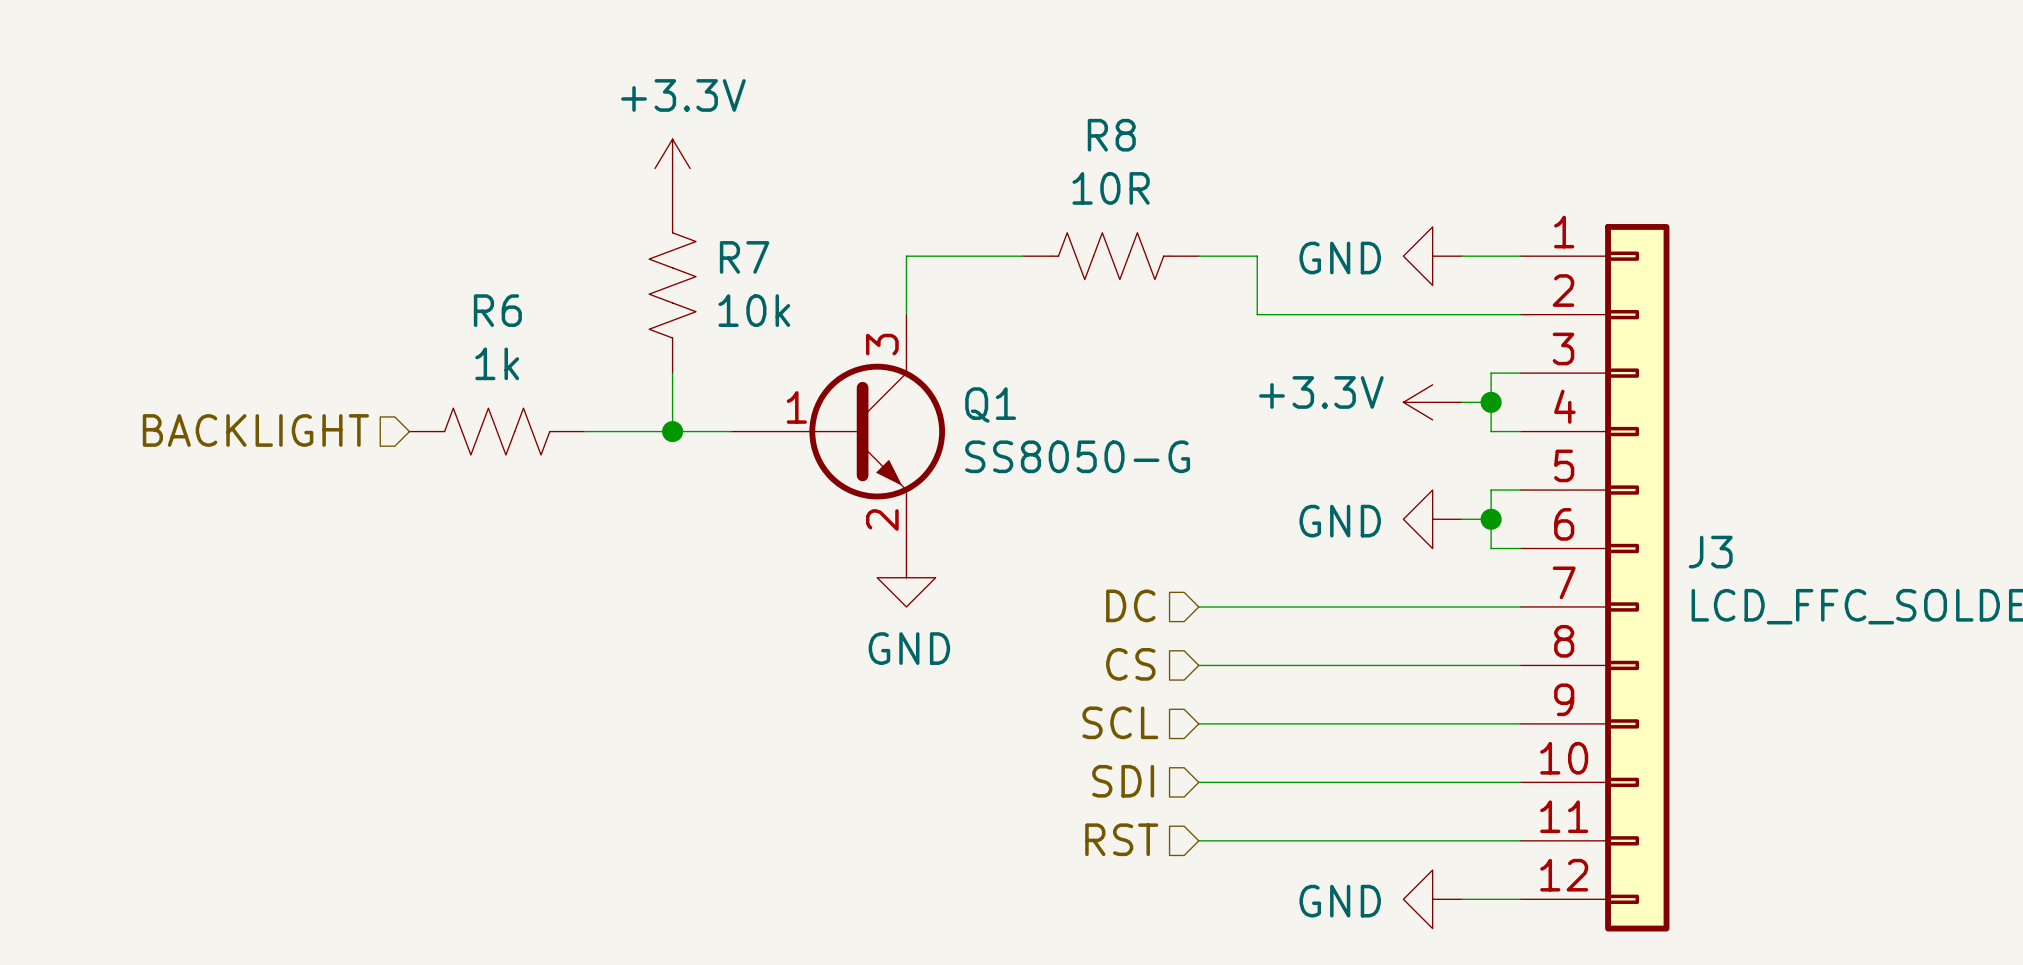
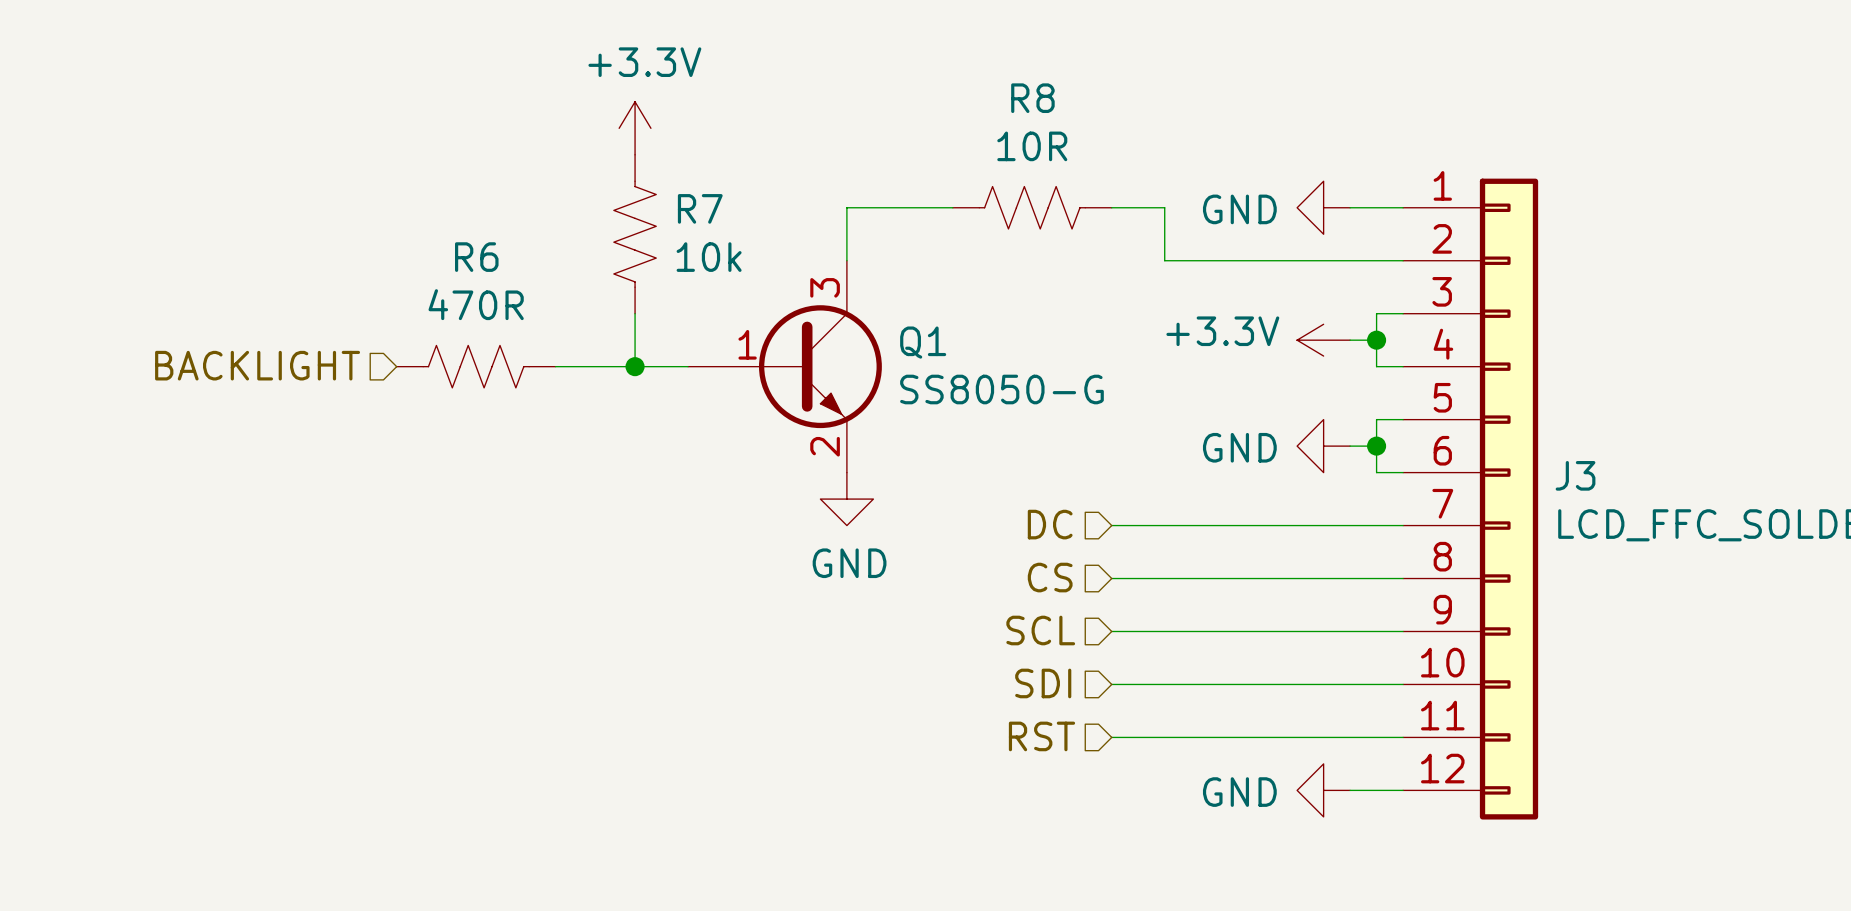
R6 value: 1k (497, 363) -> 470R (476, 304)

